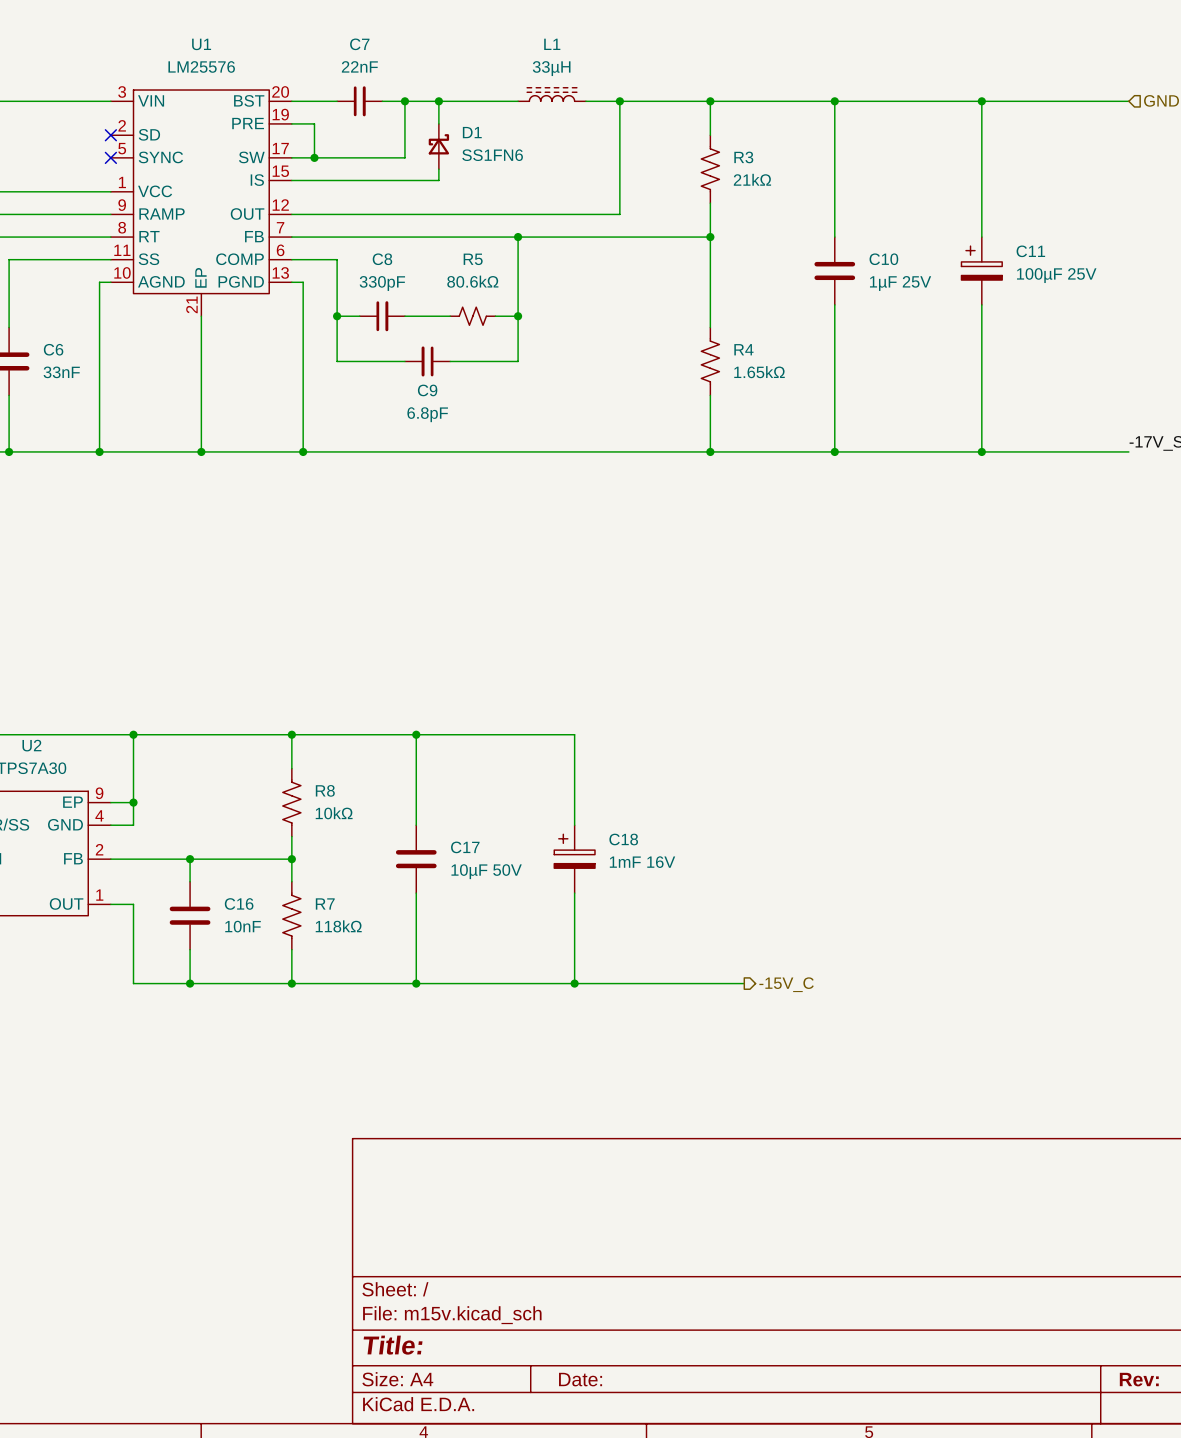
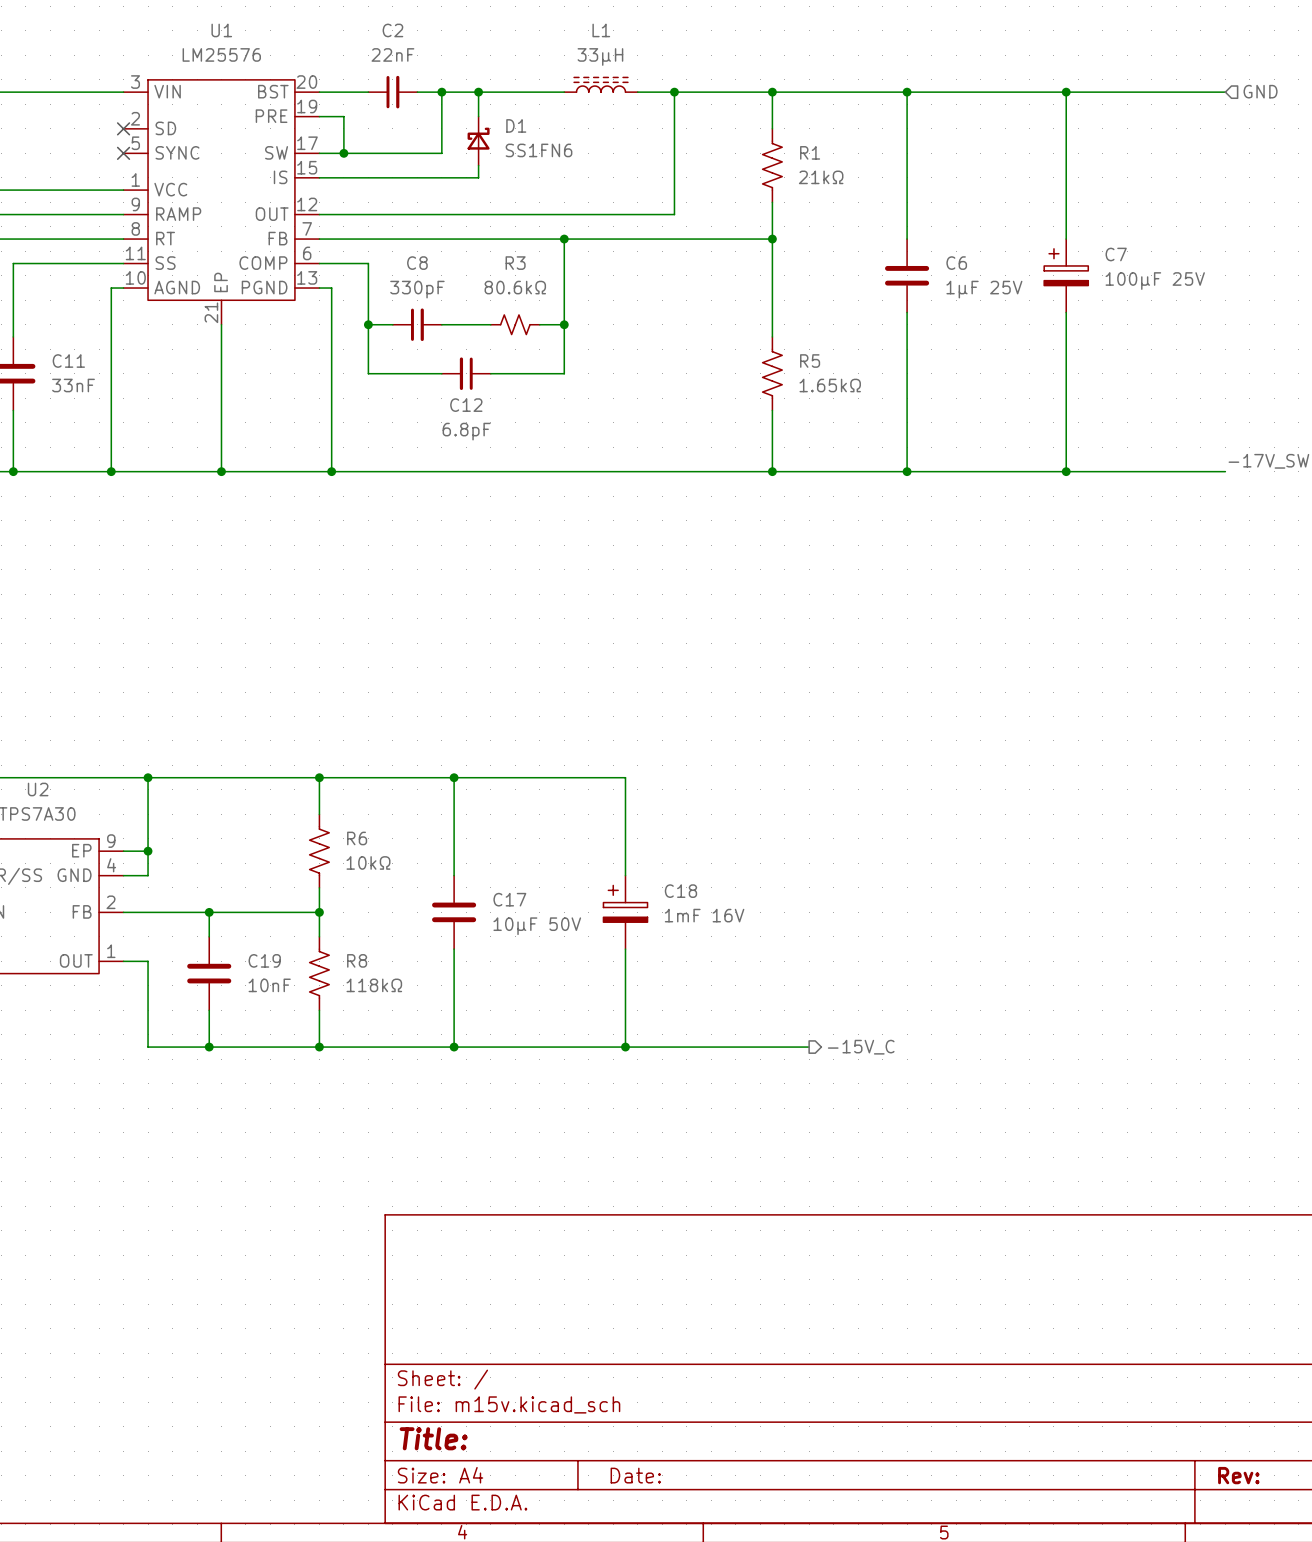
C7 name: C7 (359, 44) -> C2 (392, 30)
R3 name: R3 (743, 157) -> R1 (810, 152)
C11 name: C11 (1030, 251) -> C7 (1116, 254)
R5 name: R5 (473, 259) -> R3 (515, 263)
C10 name: C10 (883, 259) -> C6 (956, 263)
C6 name: C6 (53, 349) -> C11 (68, 361)
R4 name: R4 (743, 349) -> R5 (810, 361)
C9 name: C9 (427, 390) -> C12 (466, 405)
R8 name: R8 (325, 790) -> R6 (357, 838)
C16 name: C16 (239, 903) -> C19 (264, 960)
R7 name: R7 (325, 903) -> R8 (357, 960)

